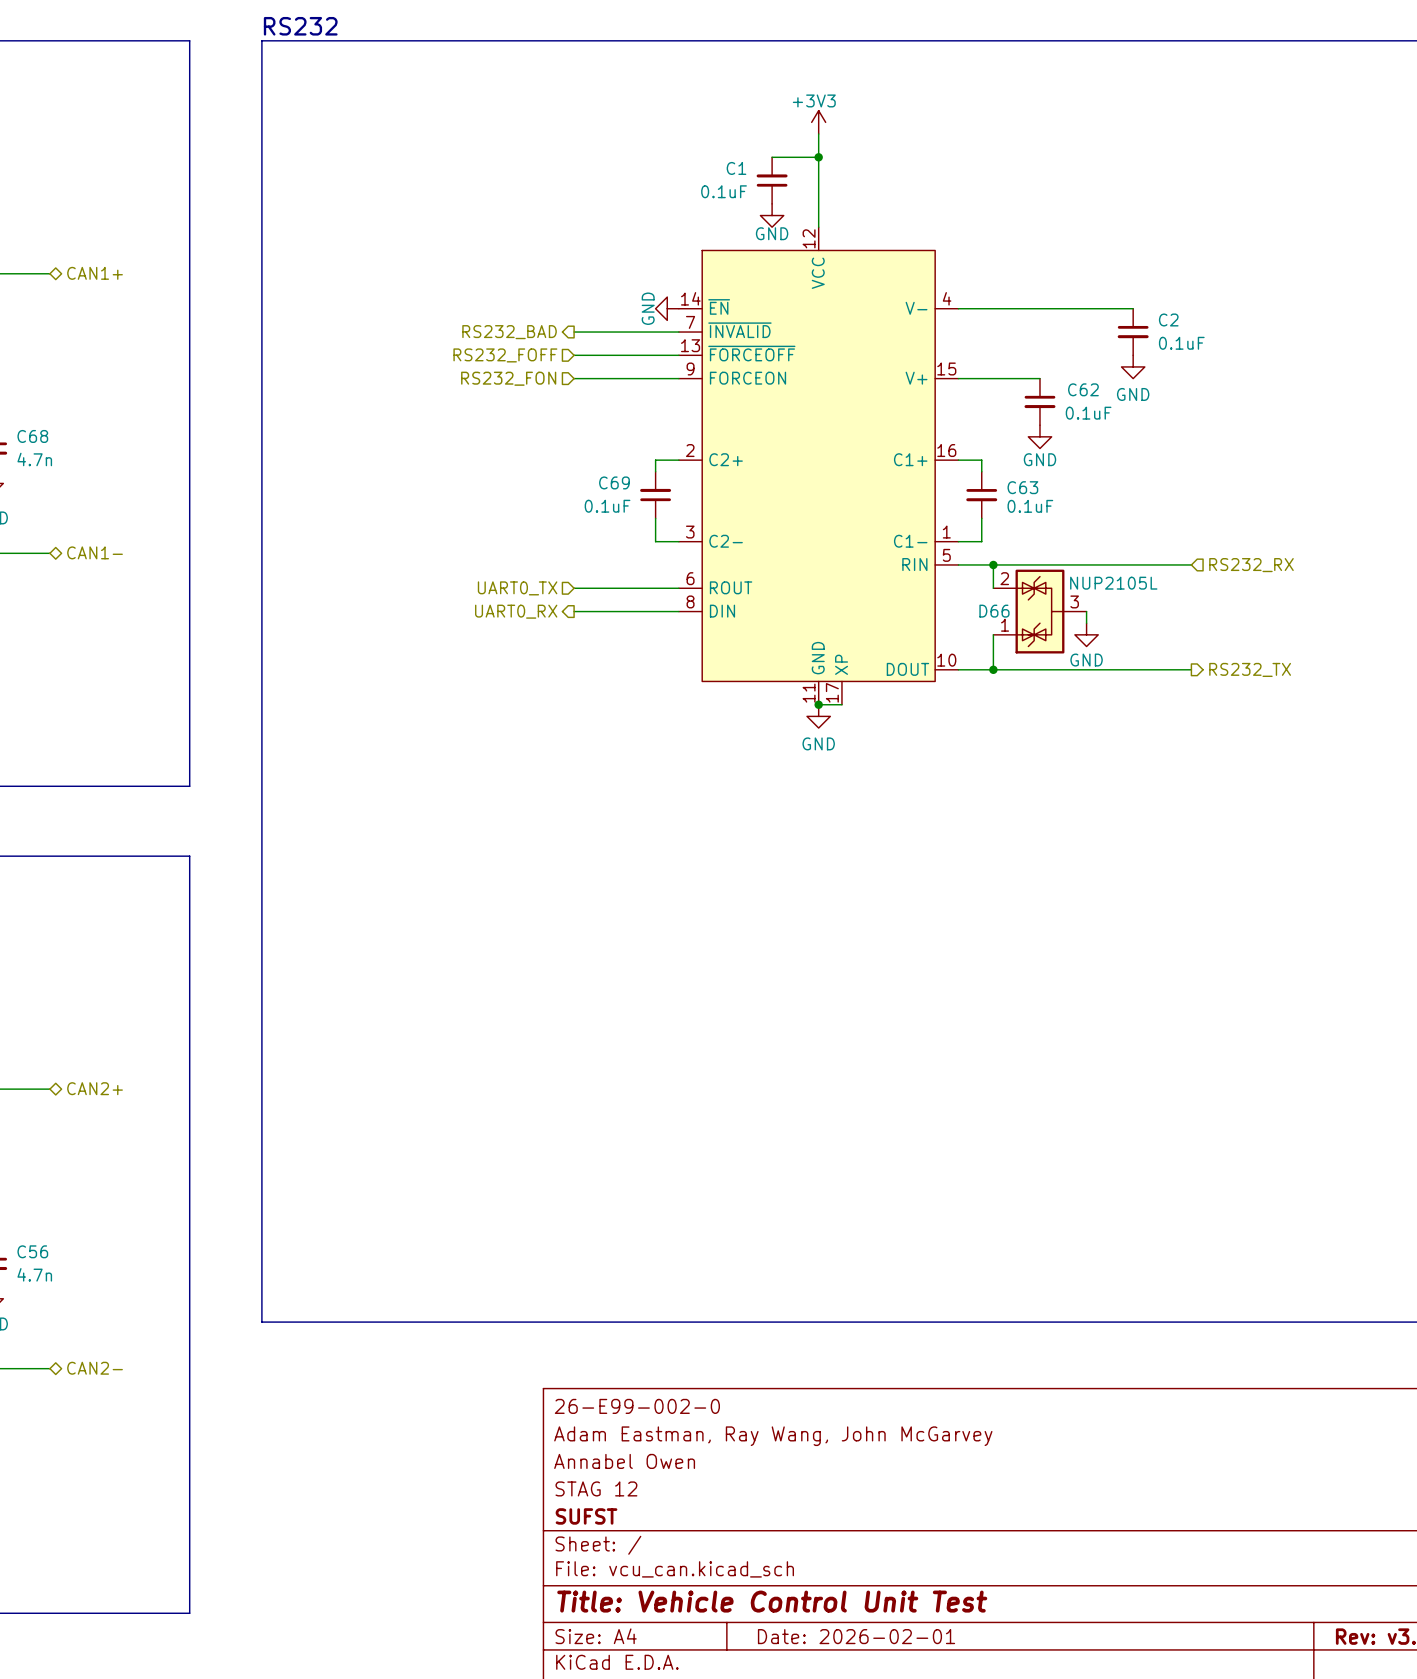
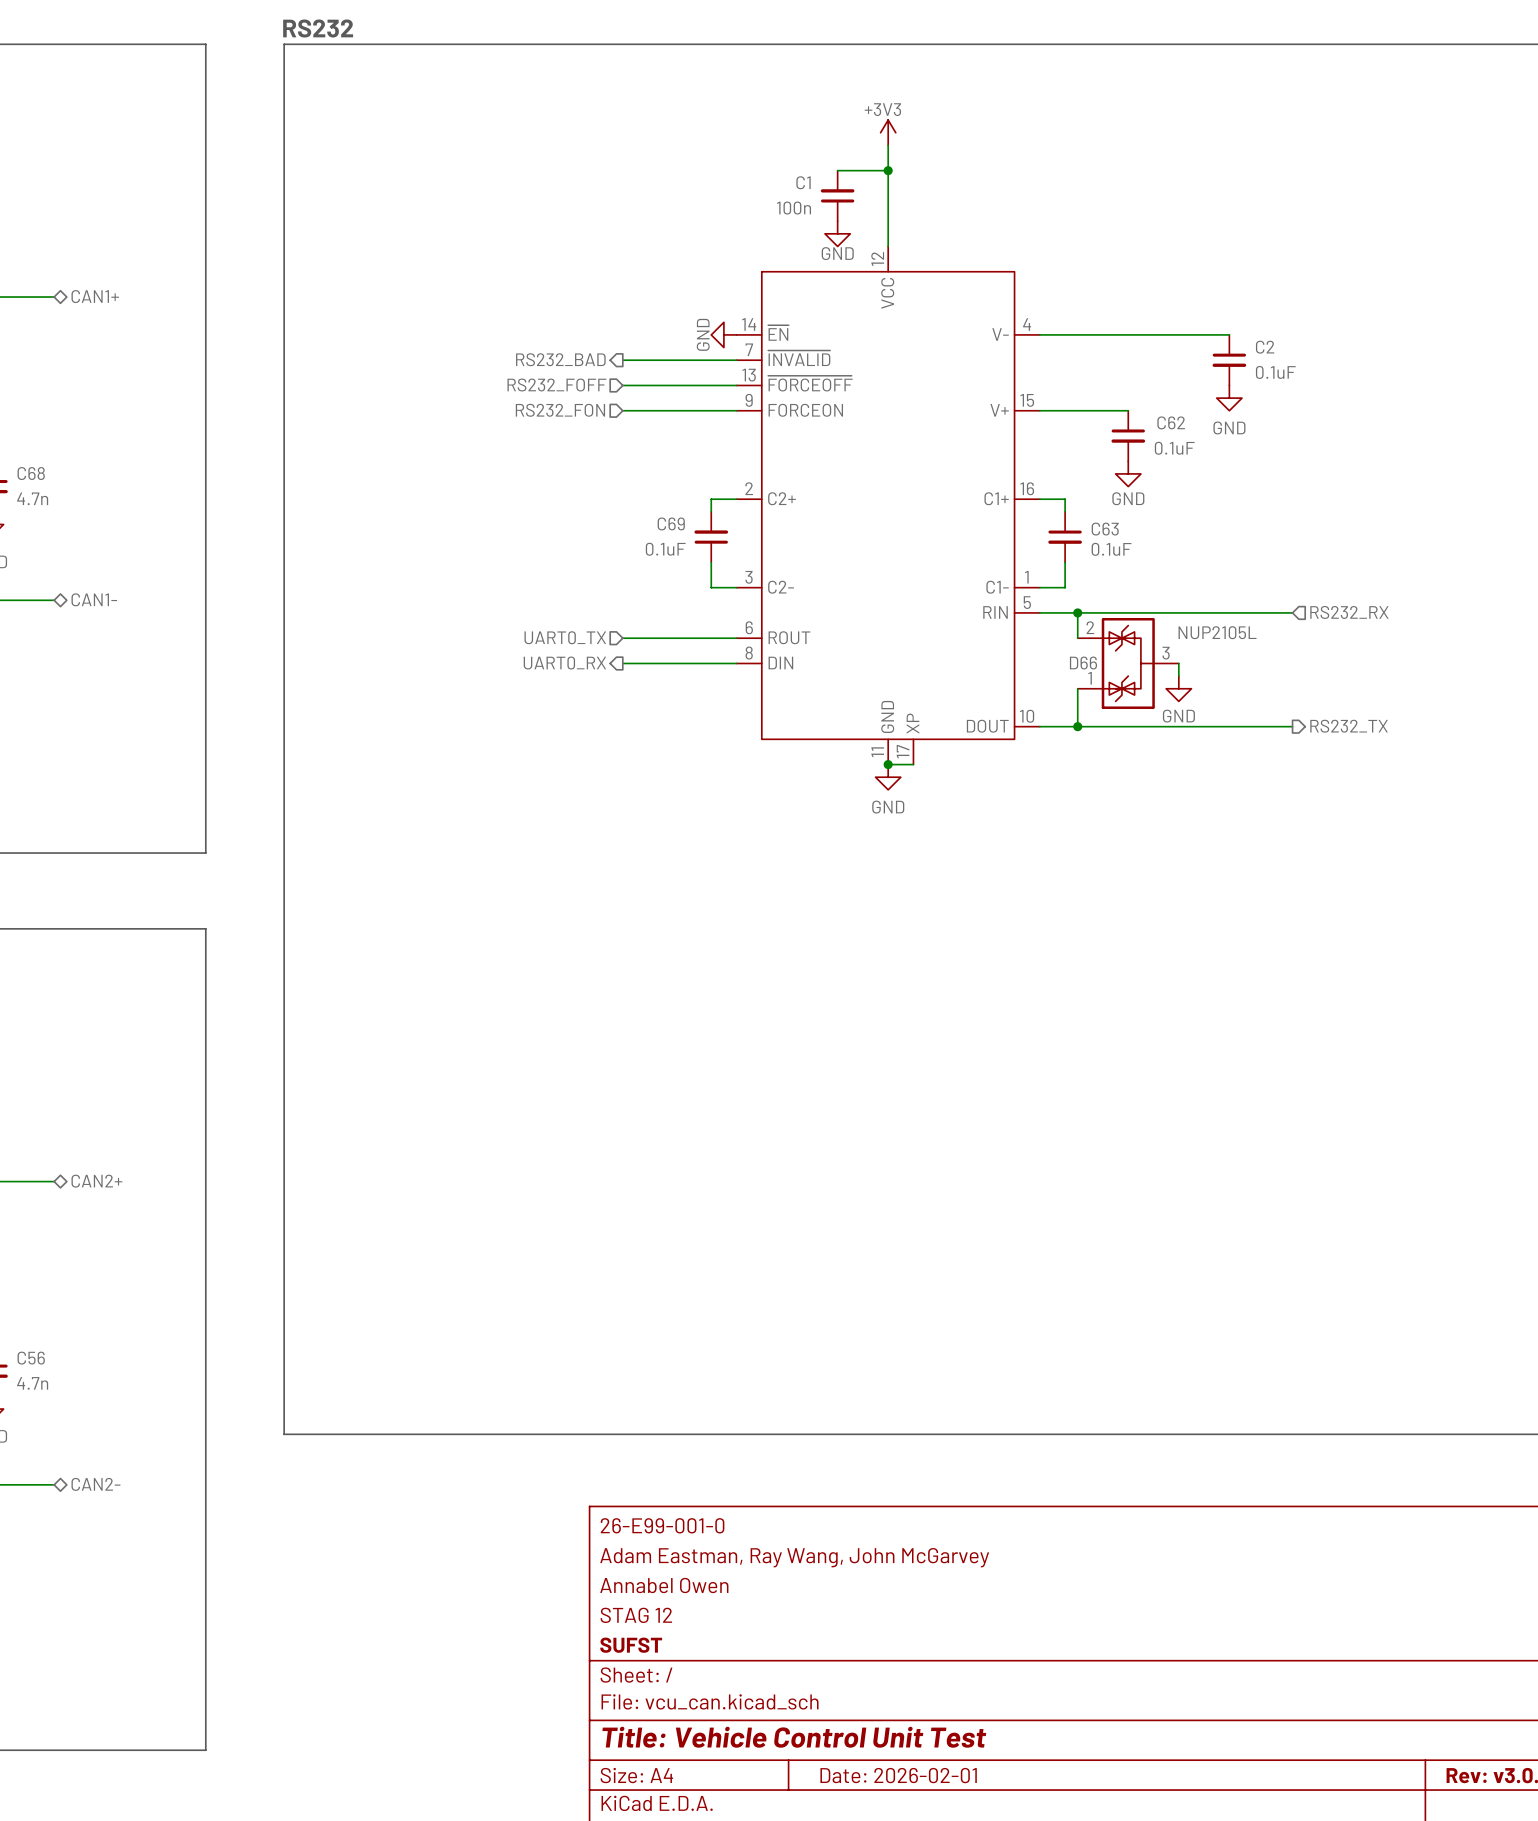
C1 value: 0.1uF (724, 191) -> 100n (793, 208)
title block: 26-E99-002-0 (637, 1406) -> 26-E99-001-0 (662, 1525)

